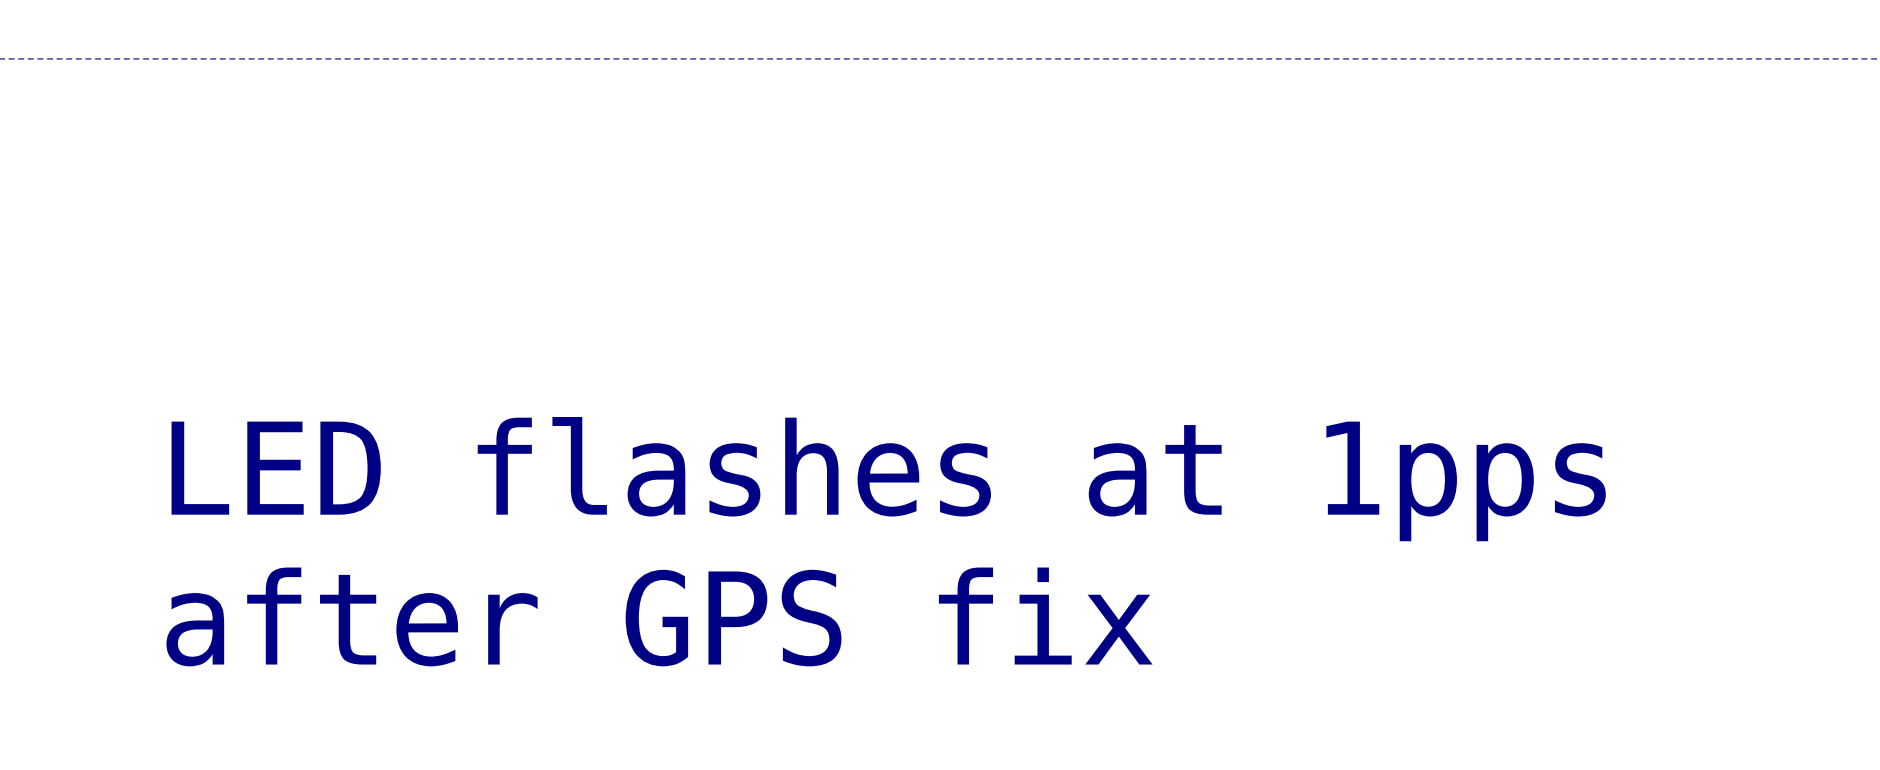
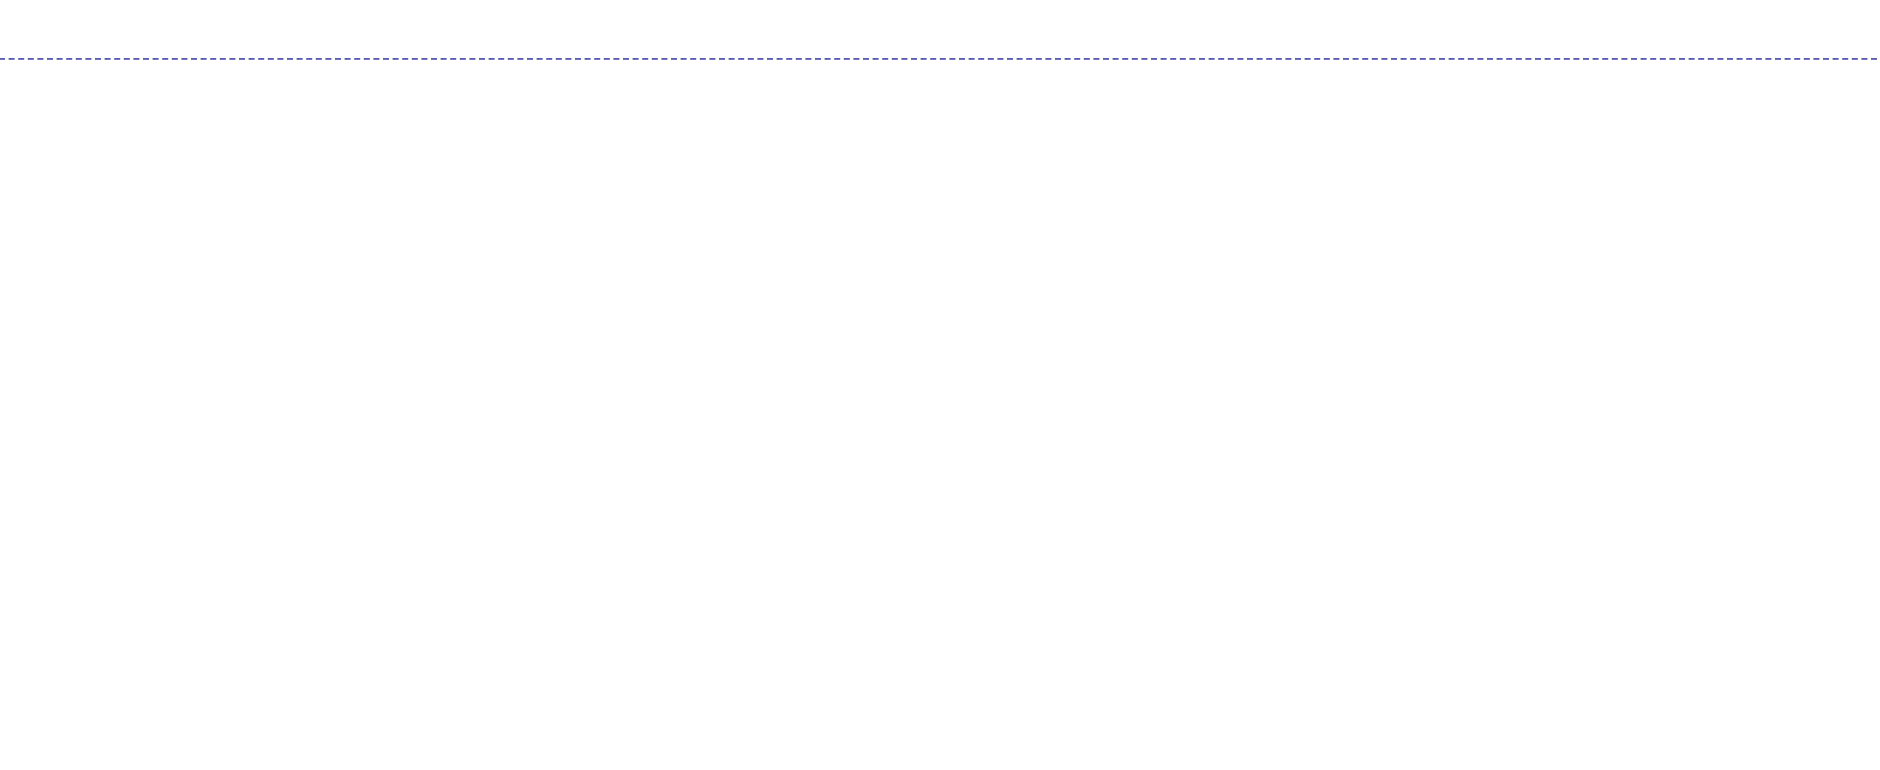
text: LED flashes at 1pps (888, 479) -> none
text: after GPS fix (659, 616) -> none

